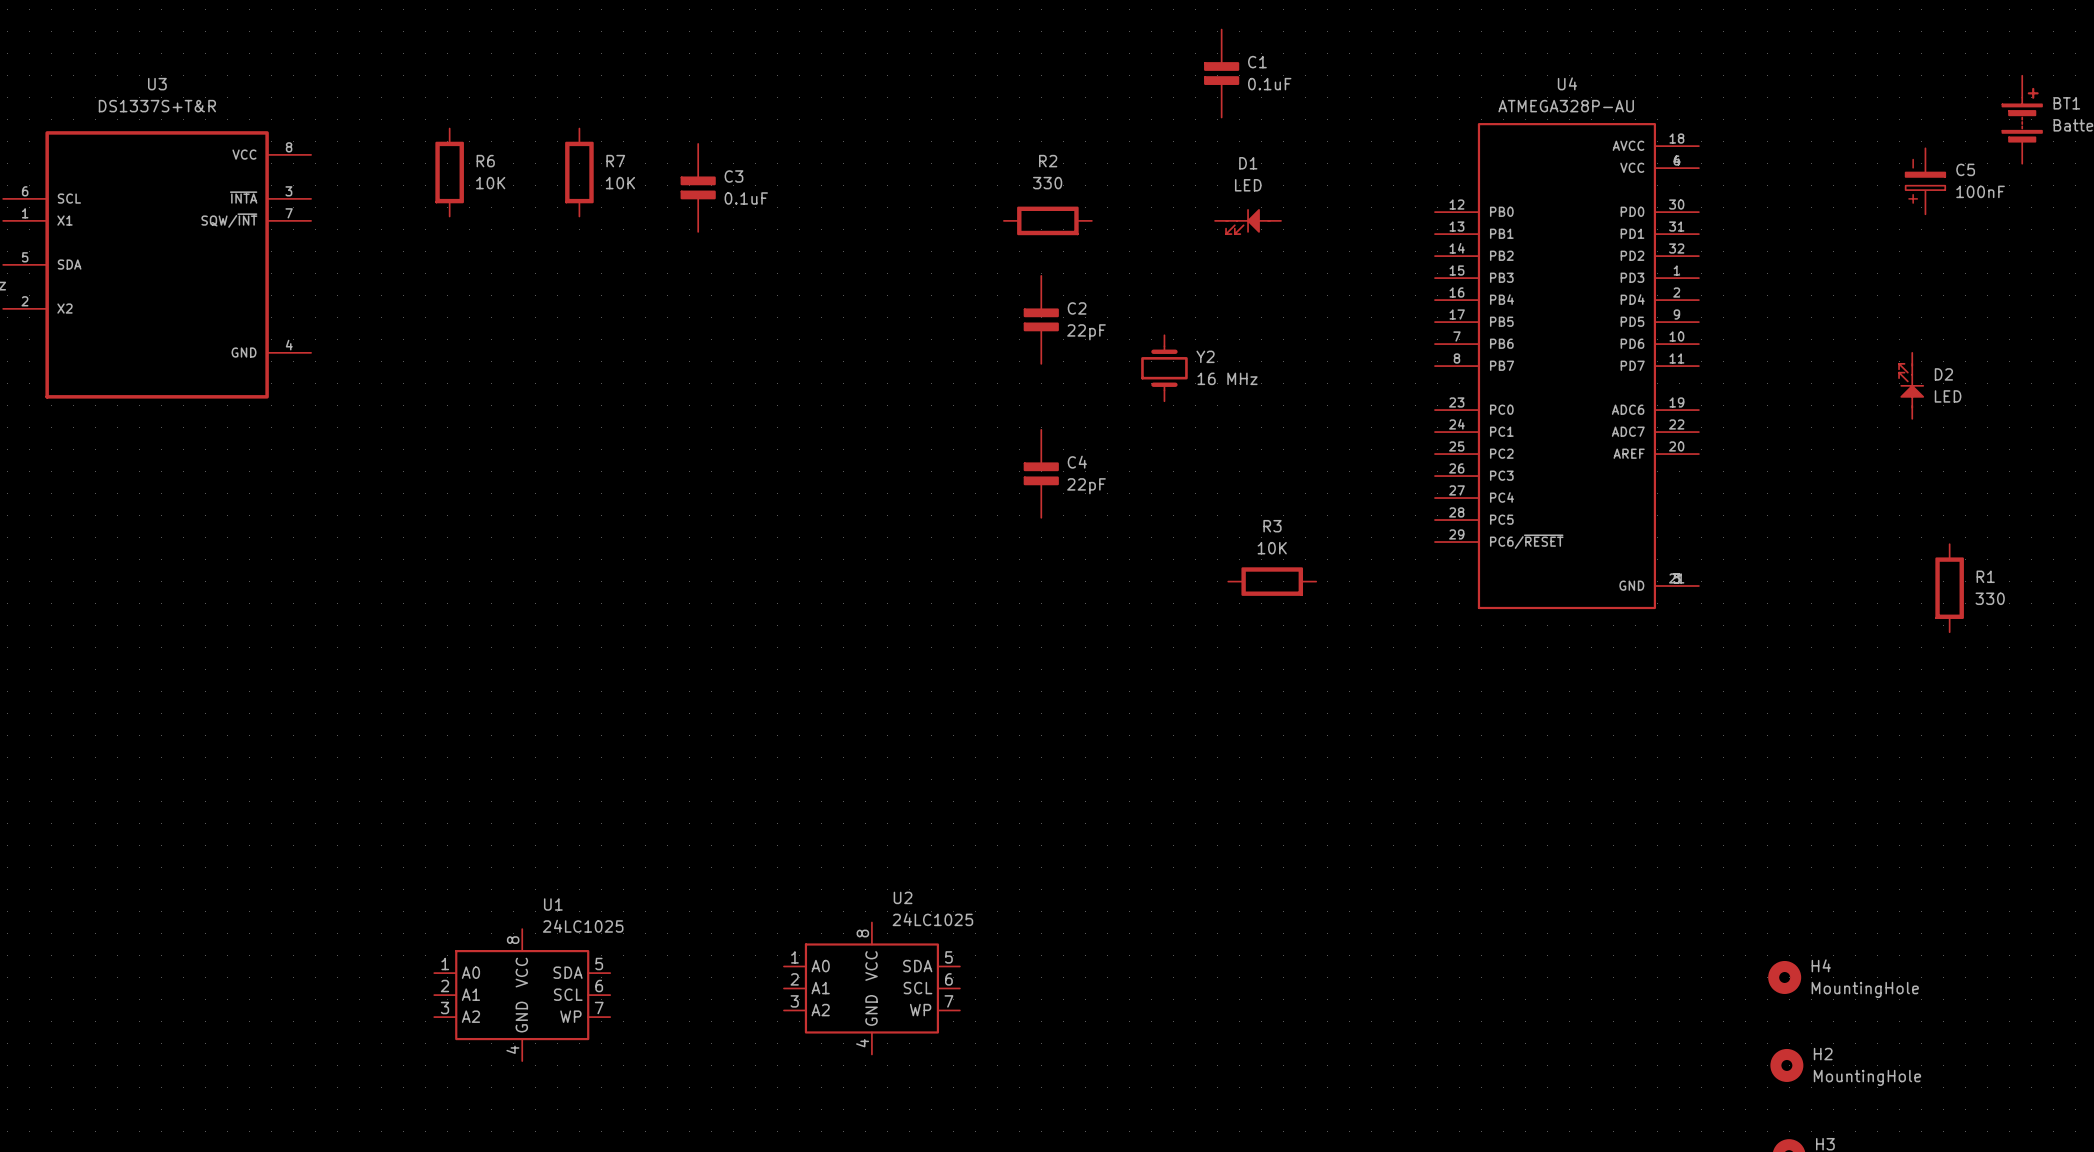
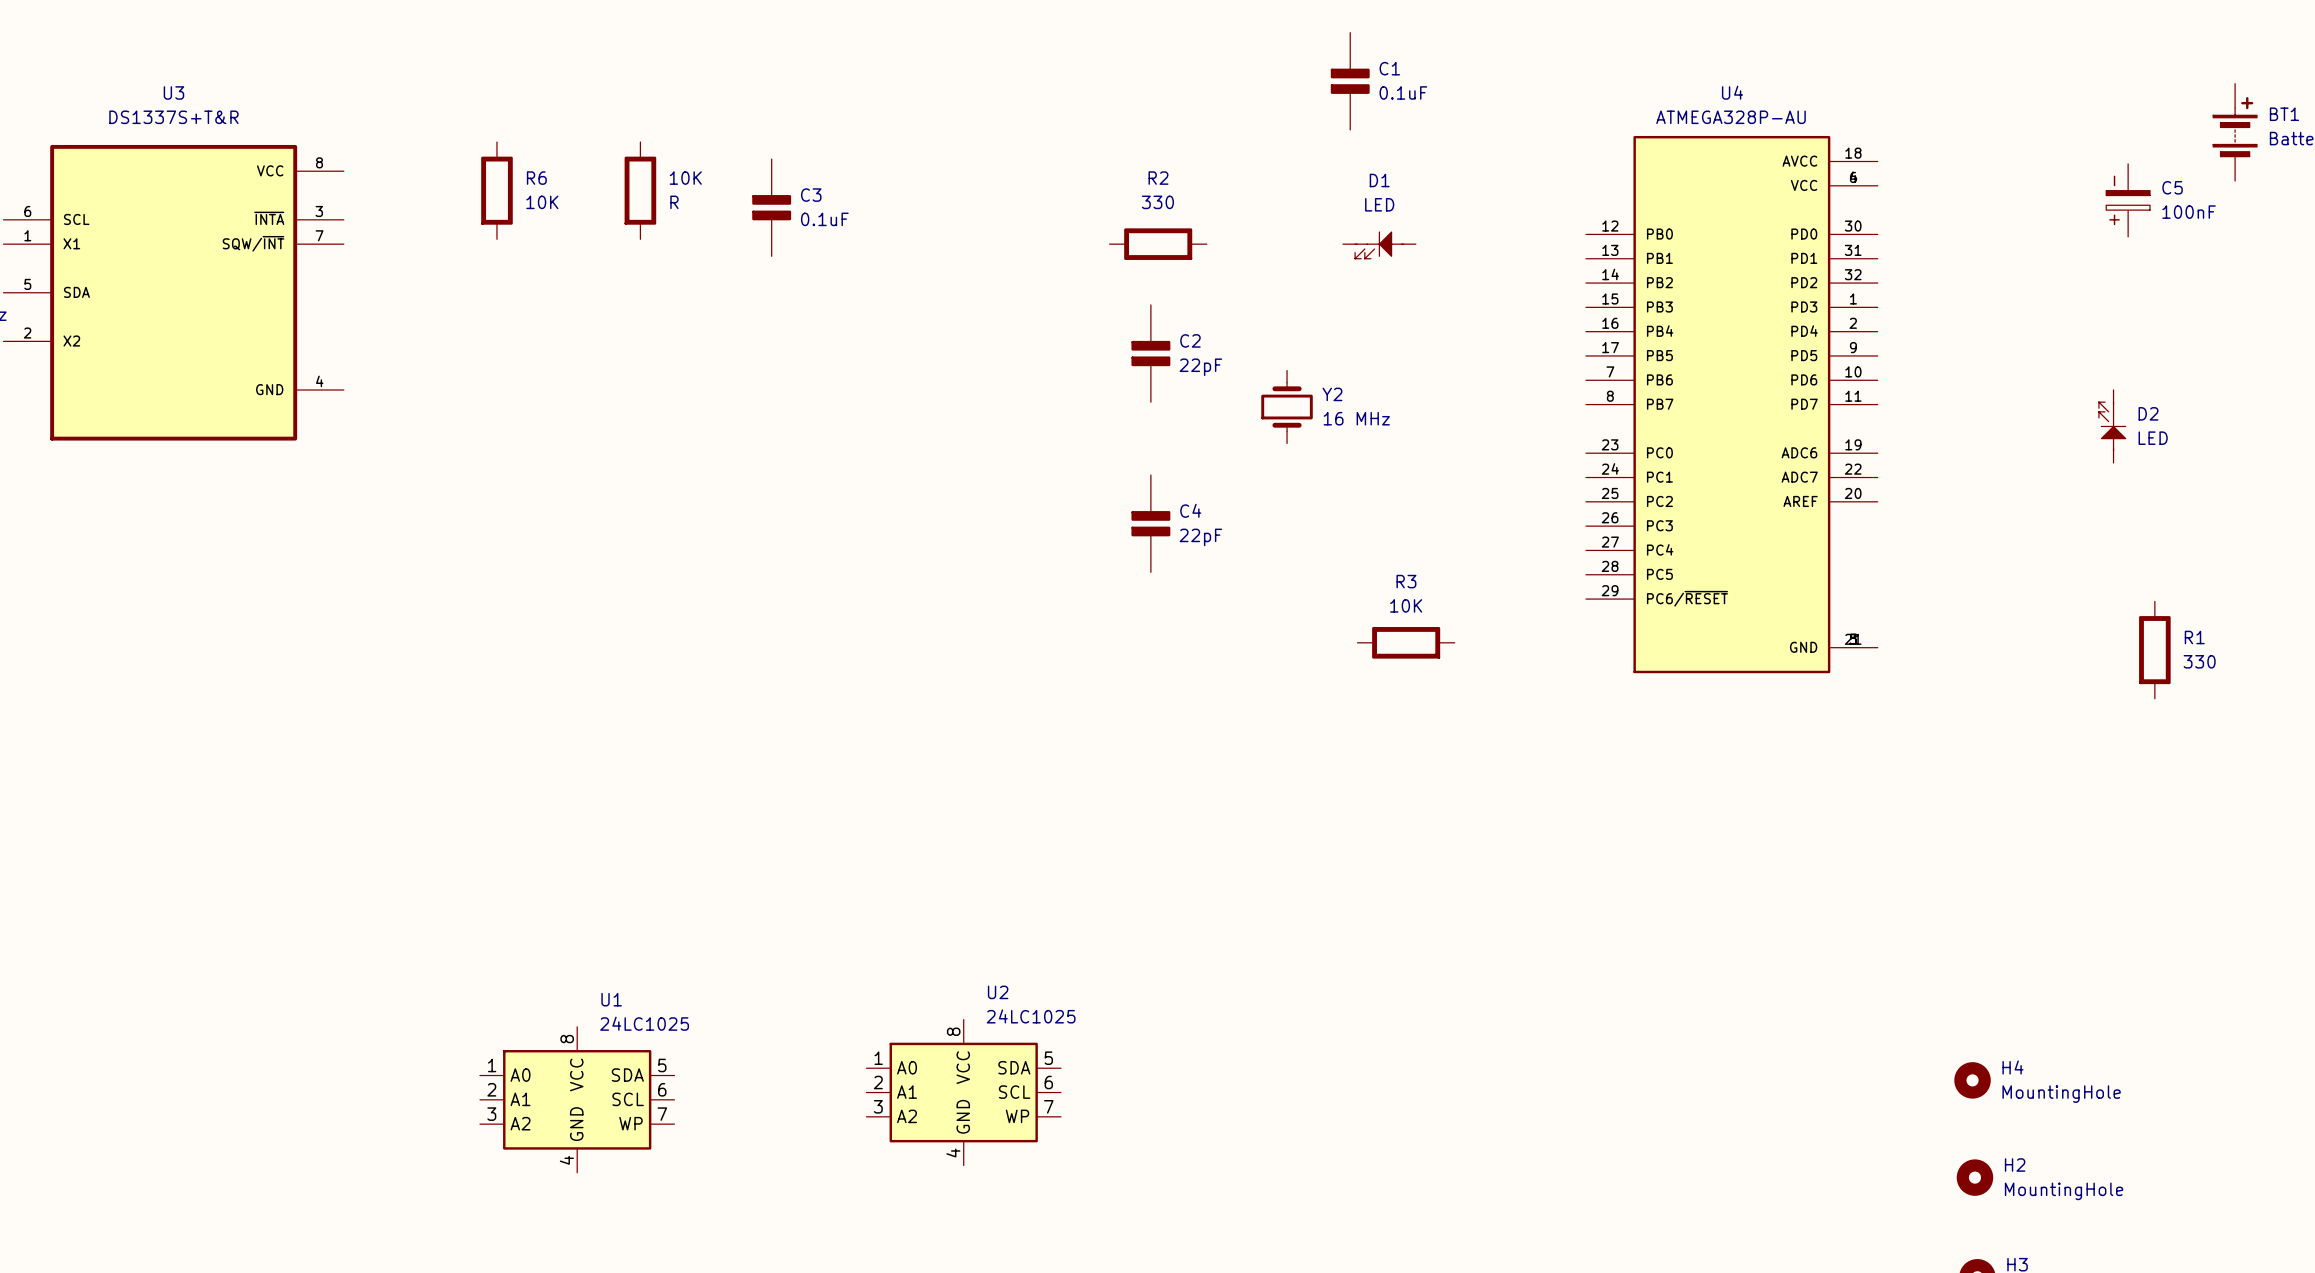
R7 name: R7 (615, 161) -> 10K (685, 178)
R7 value: 10K (620, 183) -> R (674, 202)

